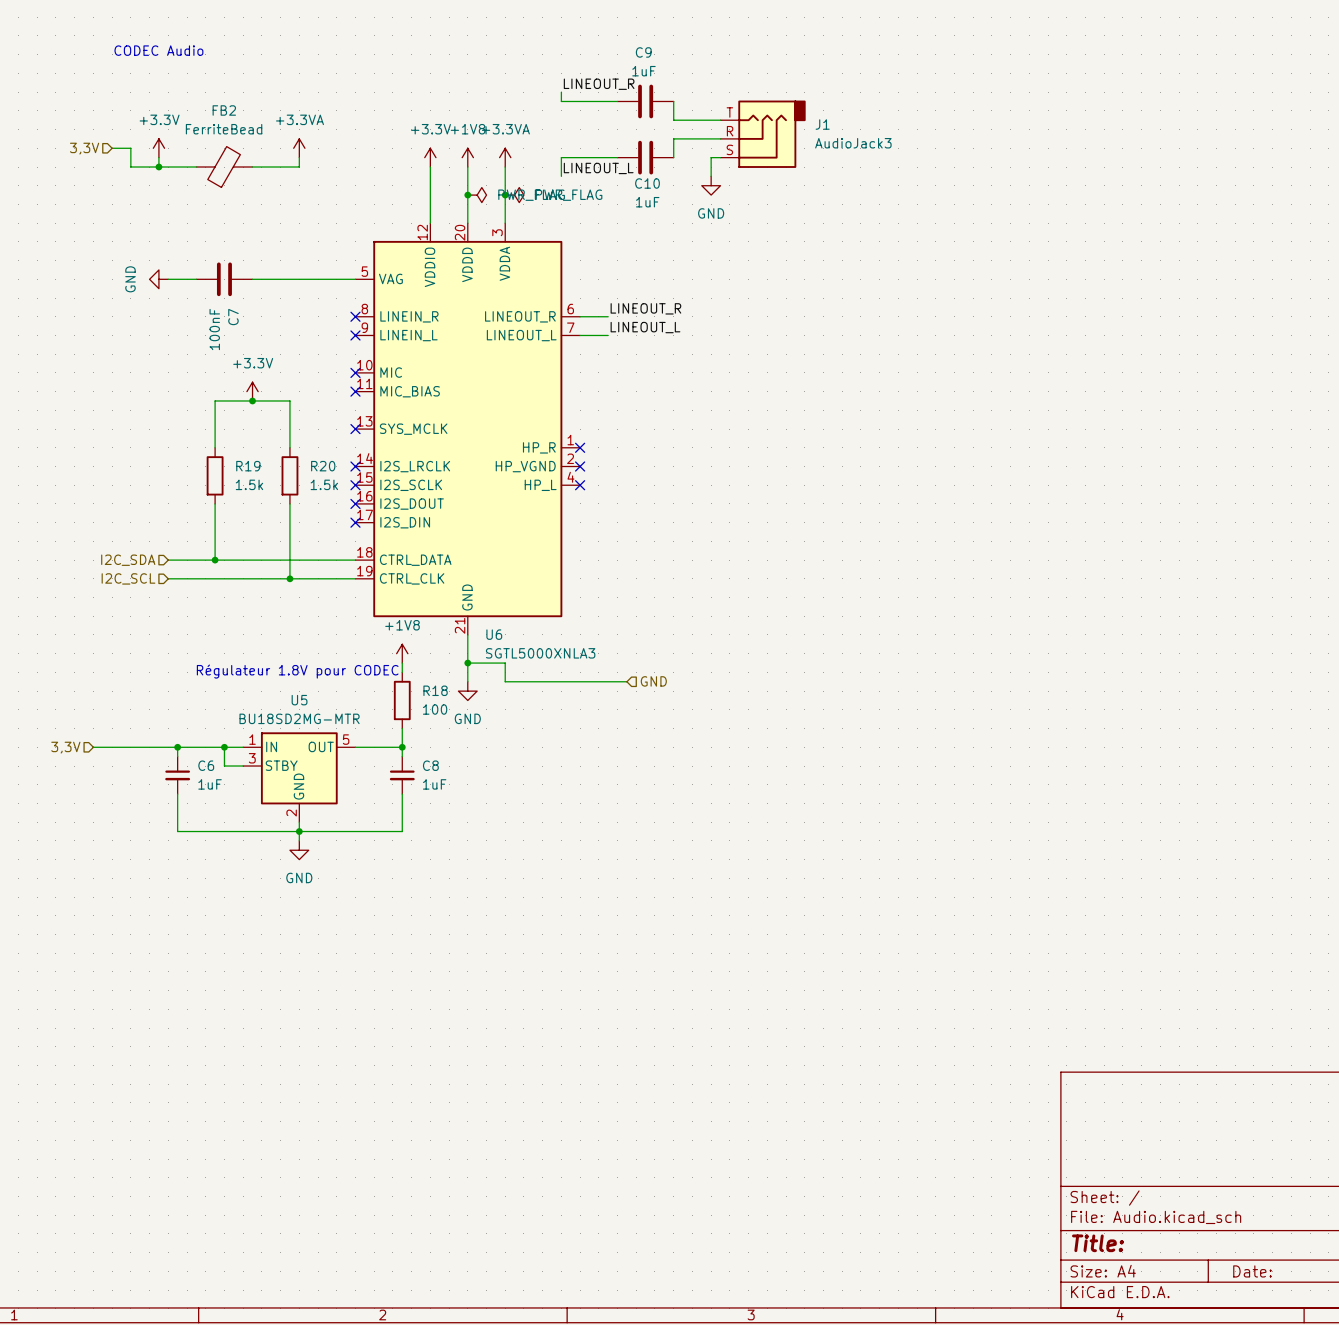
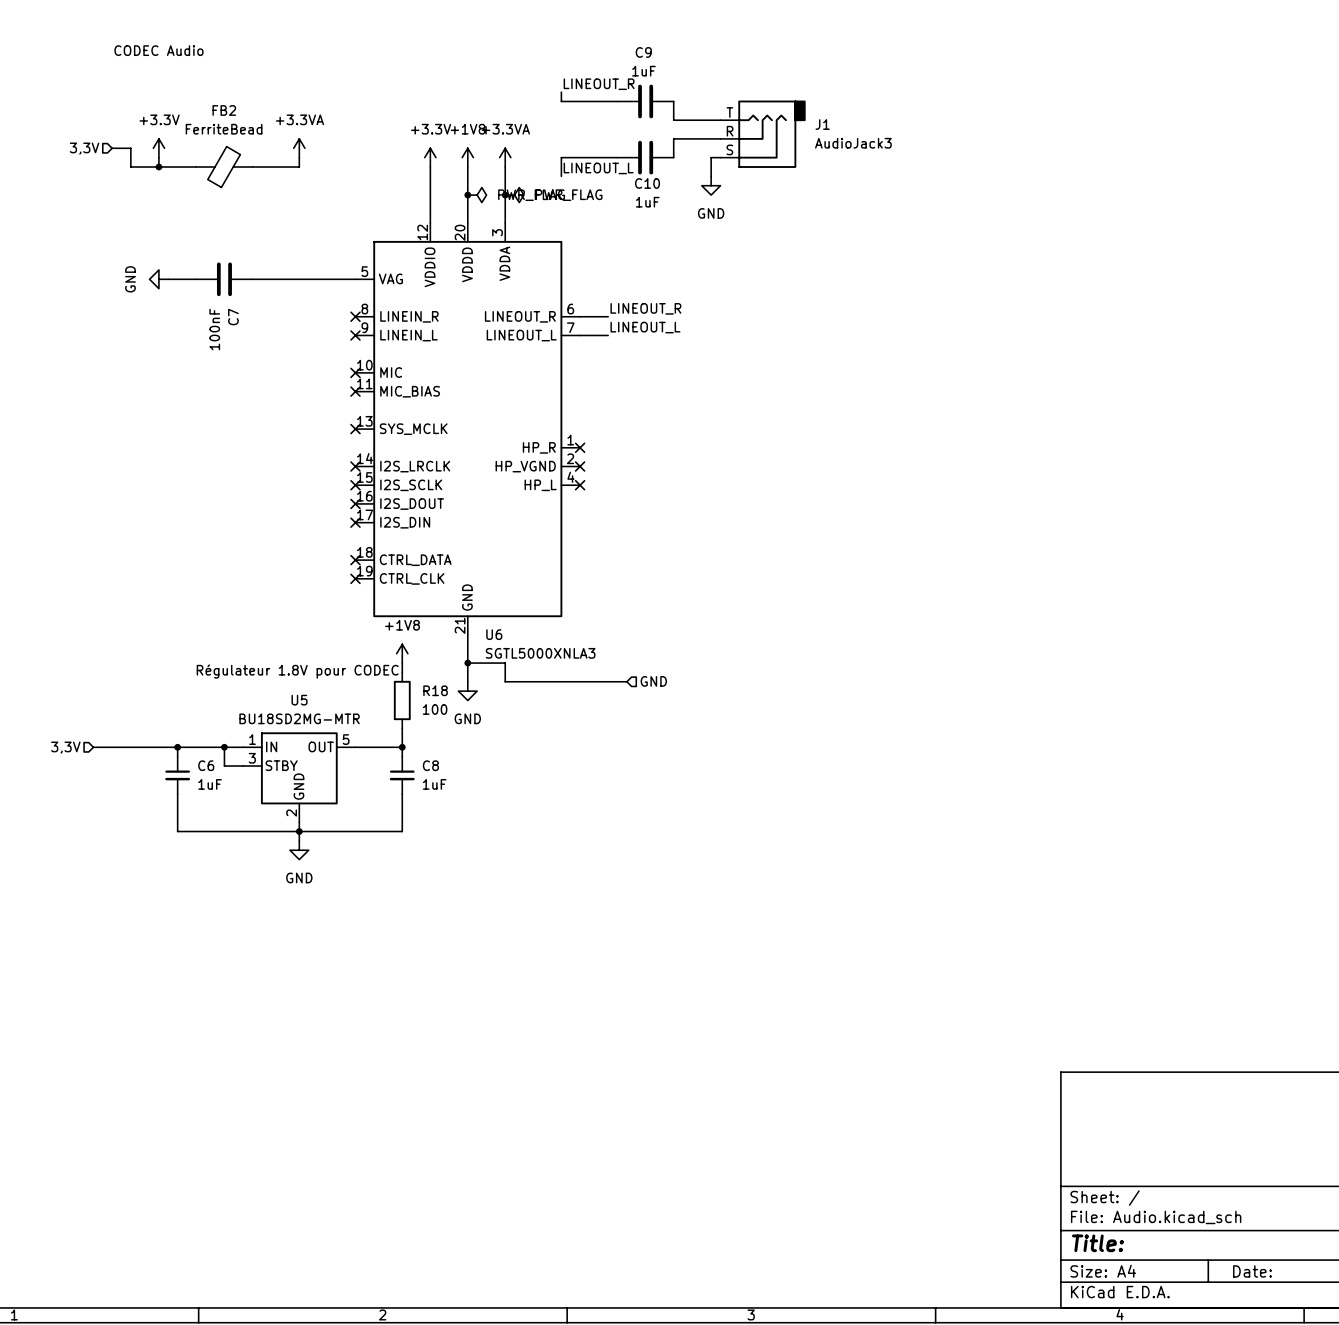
power symbol: +3.3V (252, 391) -> none
junction: (252, 400) -> none
wire: (215, 447) (215, 400) (289, 400) (289, 447) -> none
R19: 1.5k (215, 475) -> none
R20: 1.5k (289, 475) -> none
wire: (215, 503) (215, 560) -> none
wire: (289, 503) (289, 578) -> none
hierarchical label: I2C_SDA (128, 560) -> none
wire: (168, 560) (355, 560) -> none
junction: (215, 560) -> none
no-connect mark: none -> (355, 560)
hierarchical label: I2C_SCL (128, 578) -> none
wire: (168, 578) (355, 578) -> none
junction: (289, 578) -> none
no-connect mark: none -> (355, 578)

